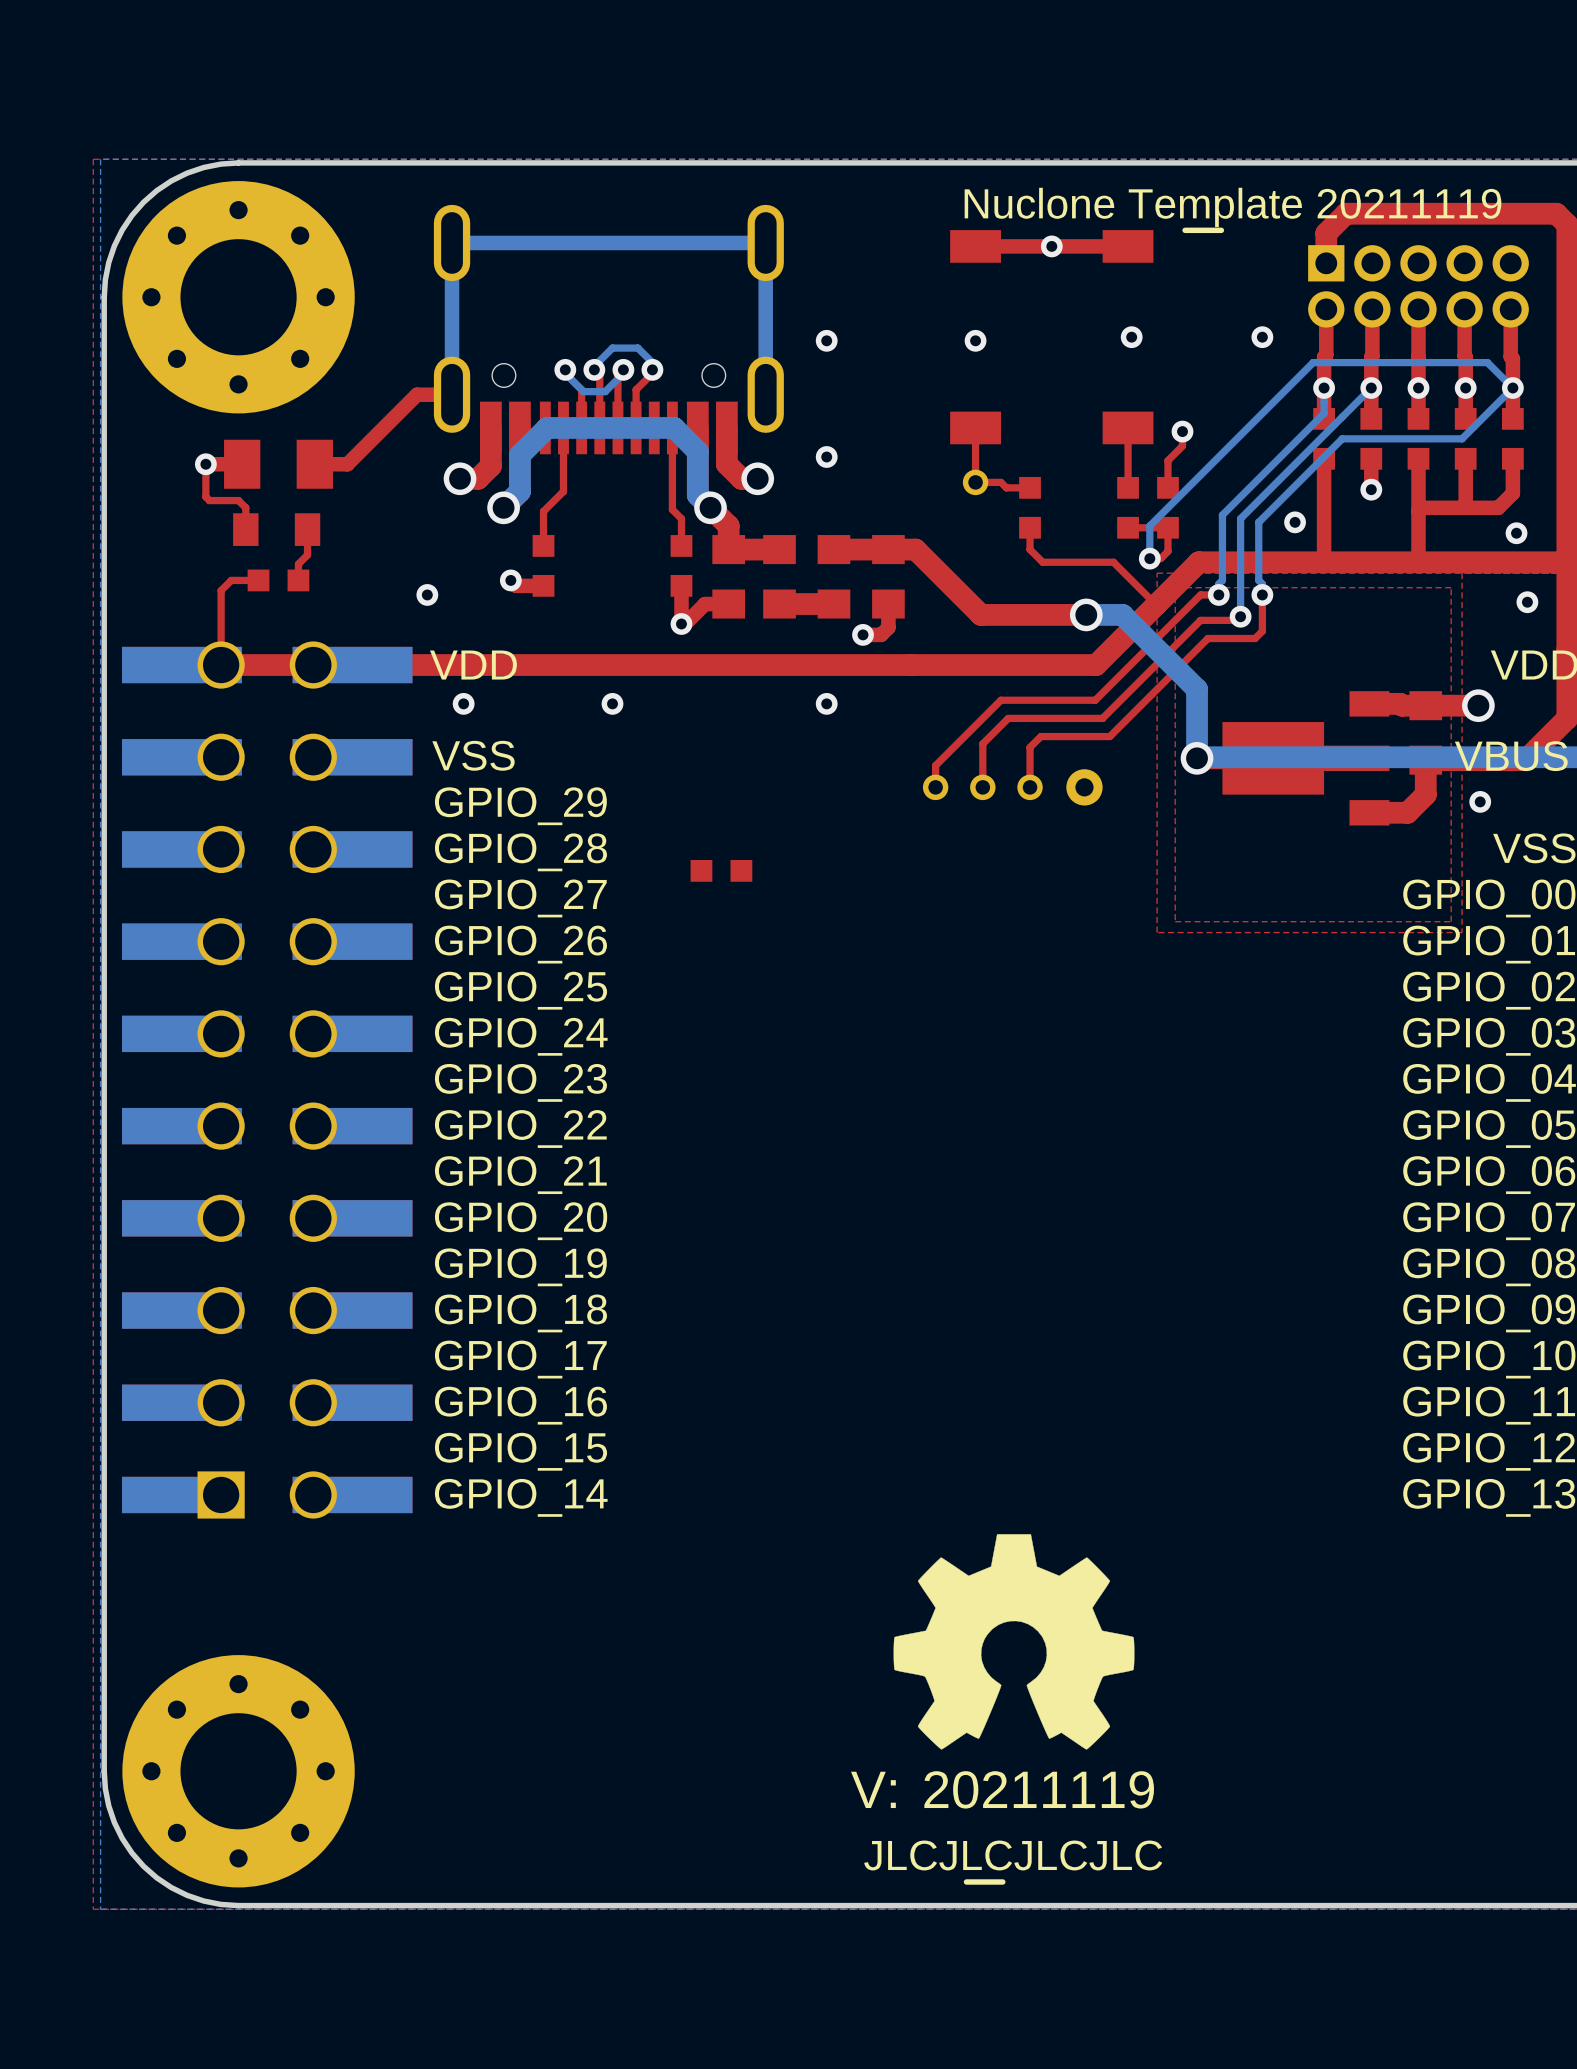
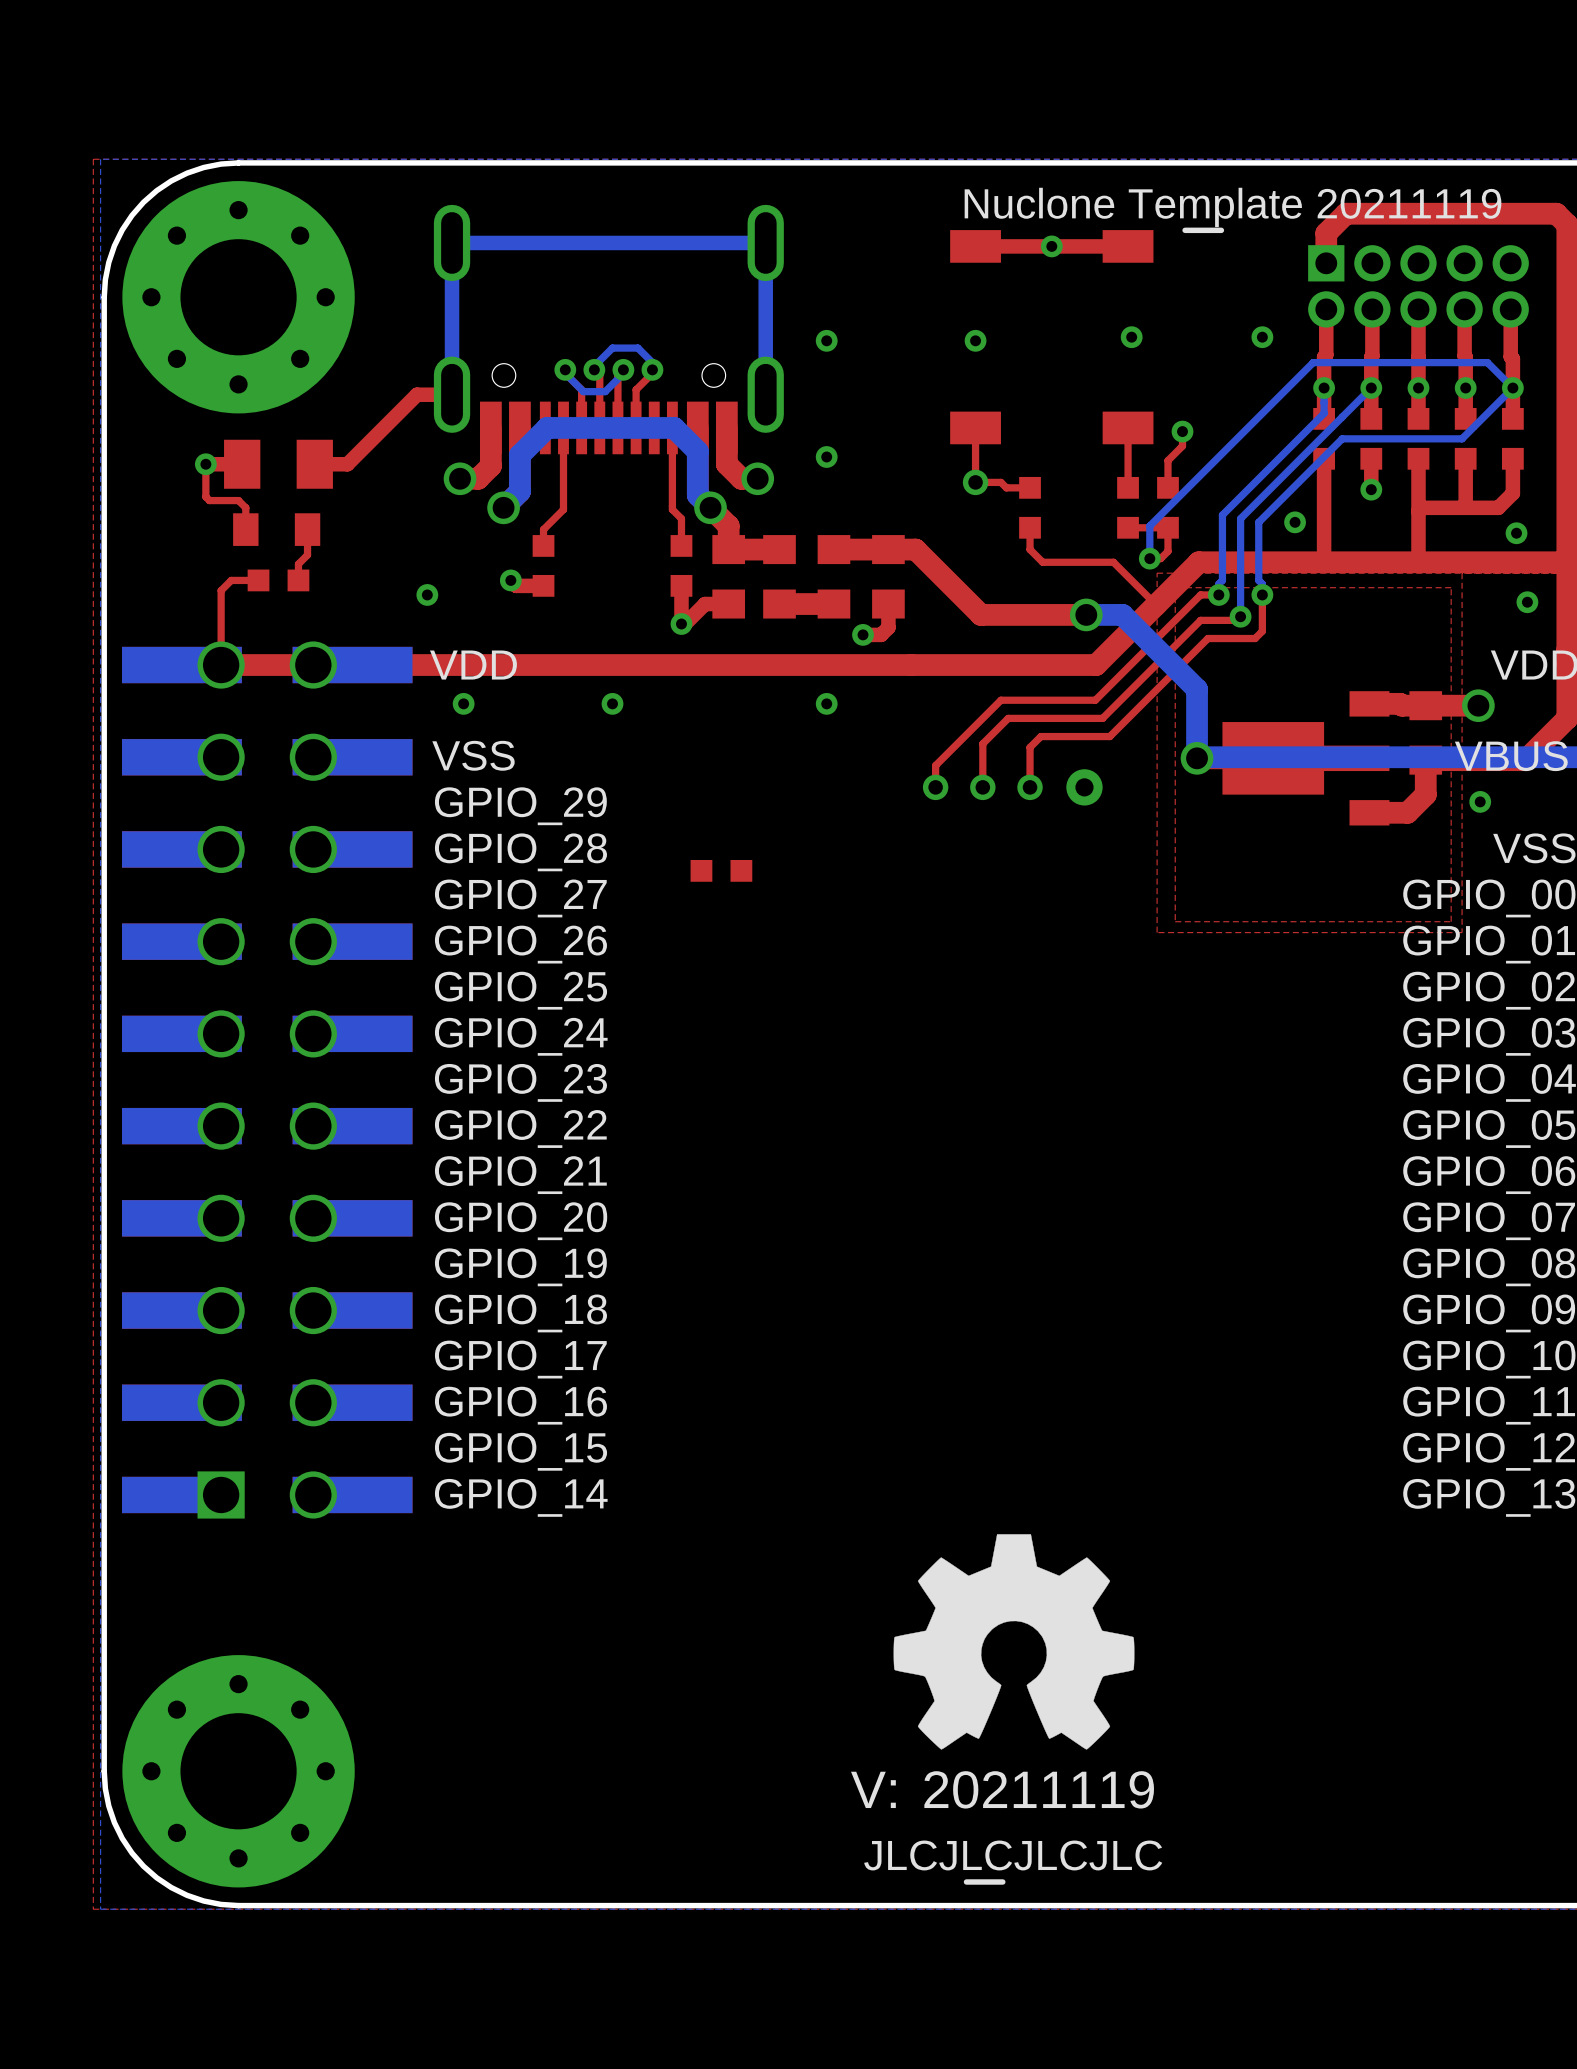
top track: (563, 491) (543, 511) (543, 529) -> (563, 491) (563, 509) (543, 529)

